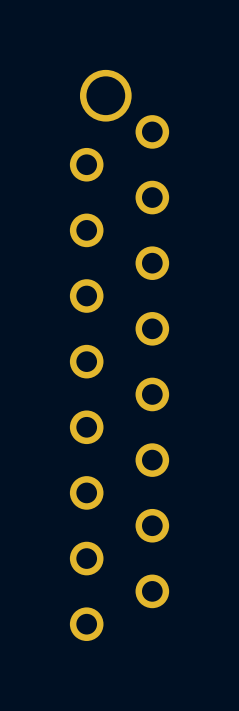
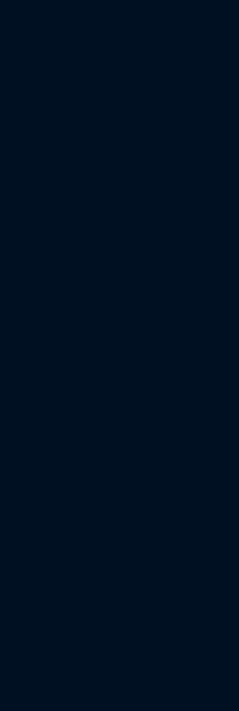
part: (119, 355) -> none

